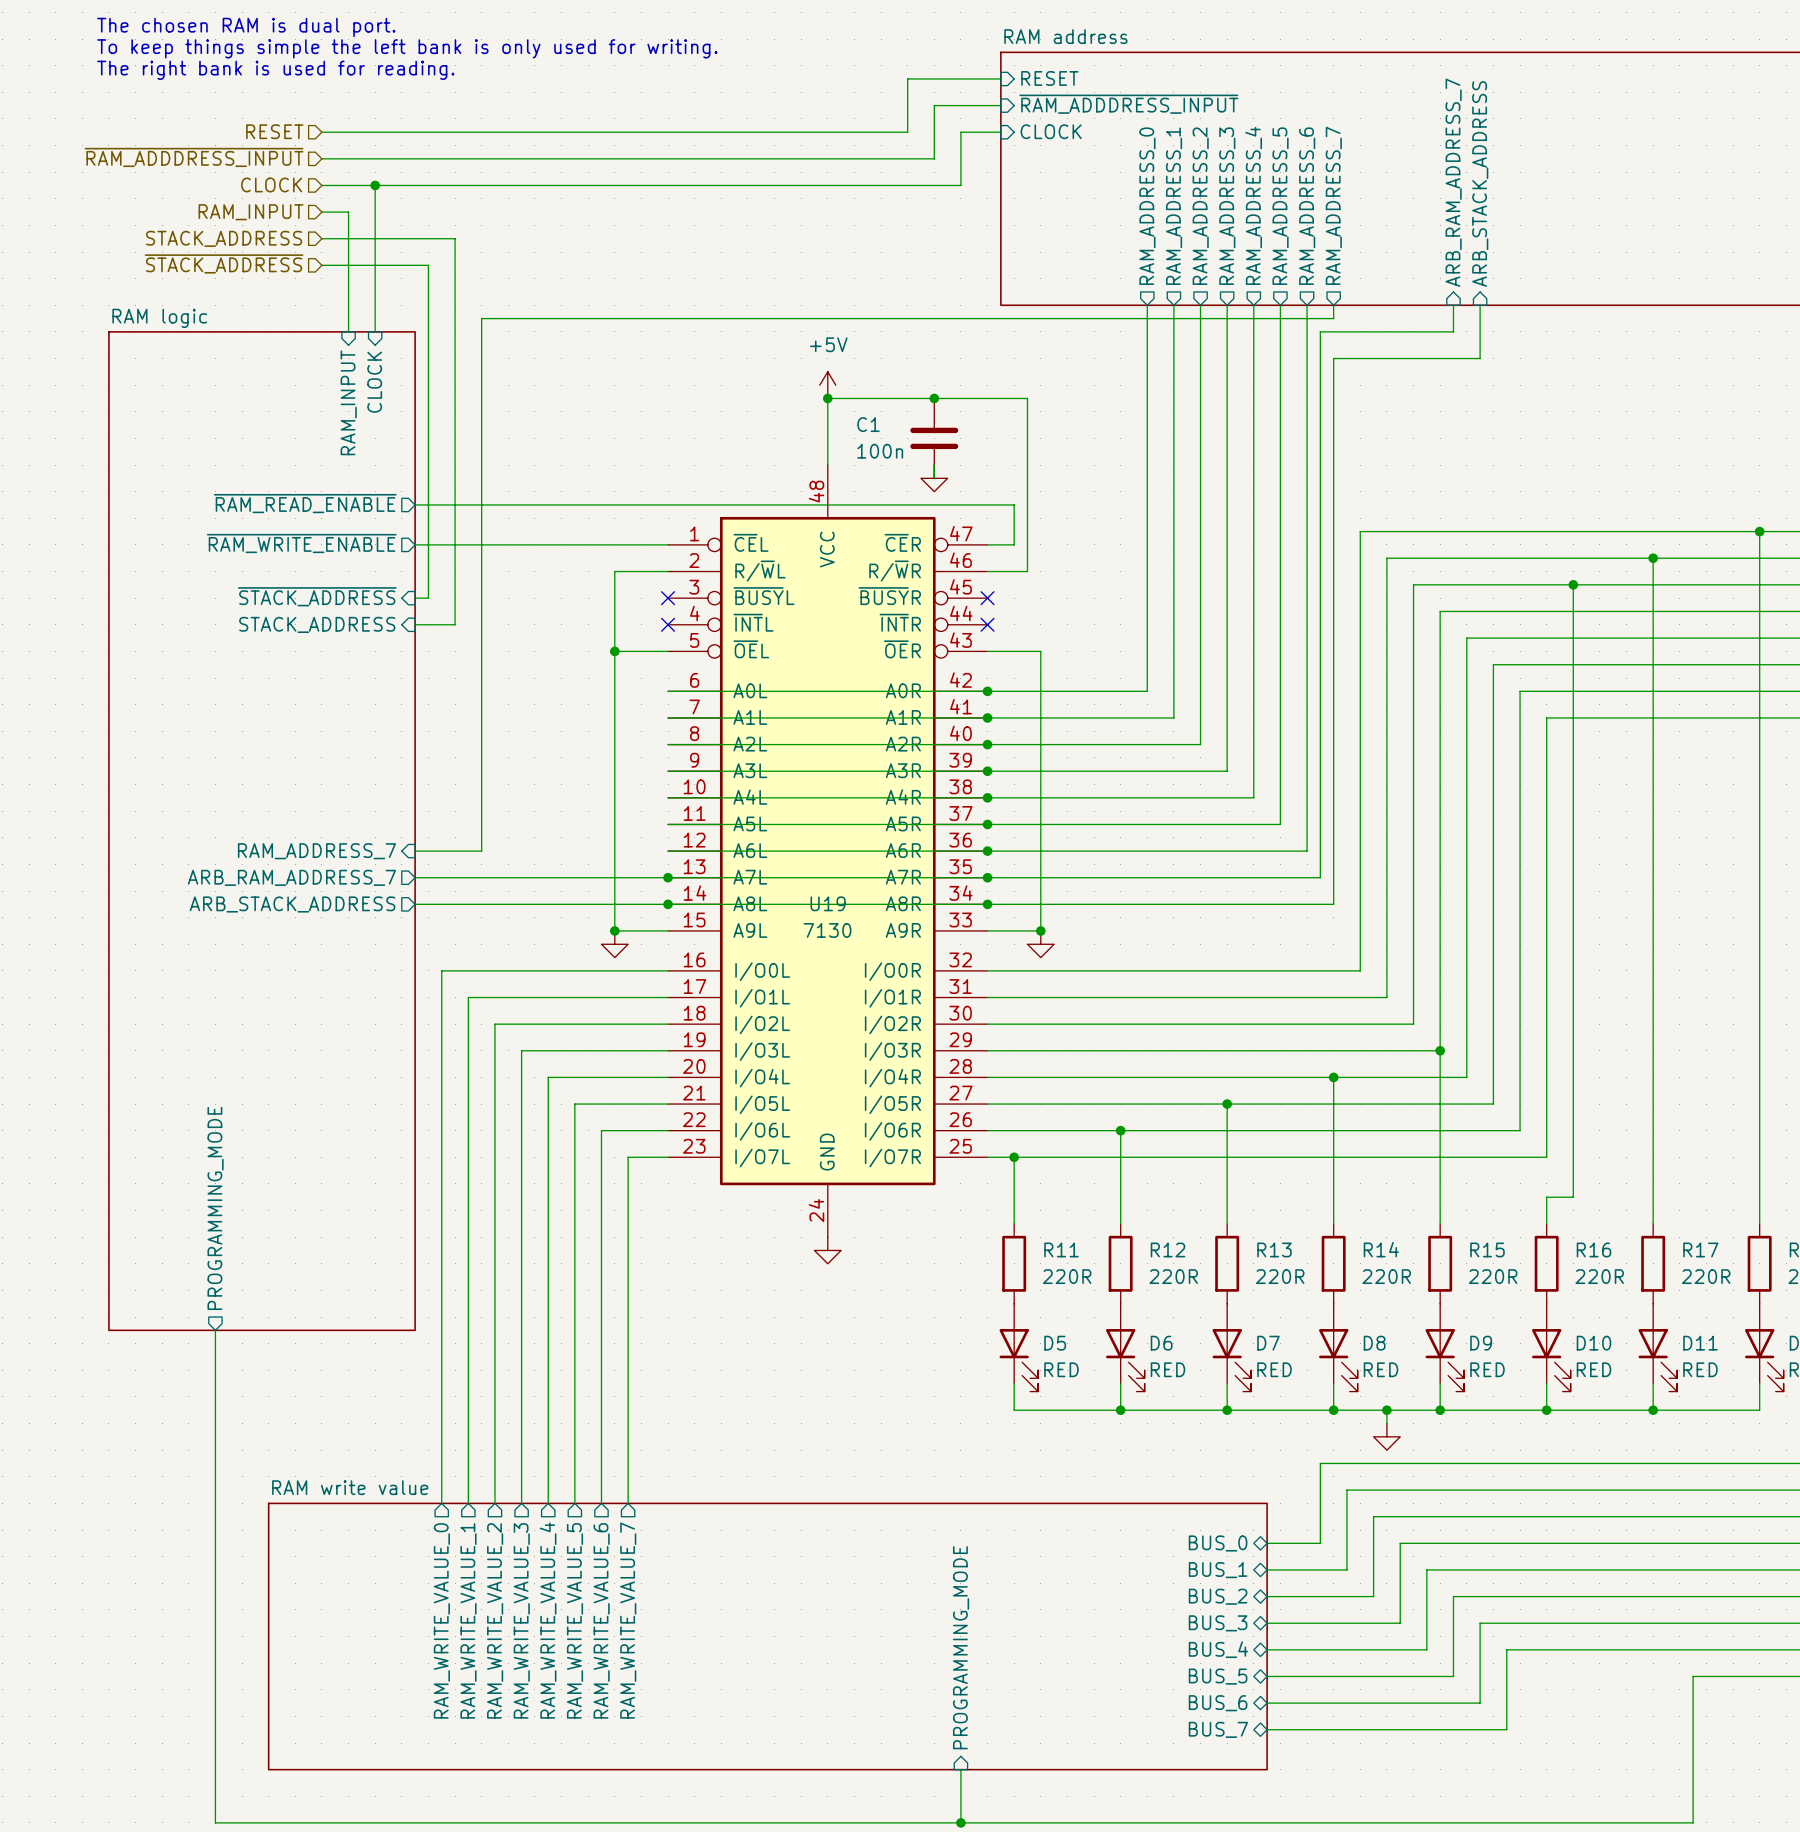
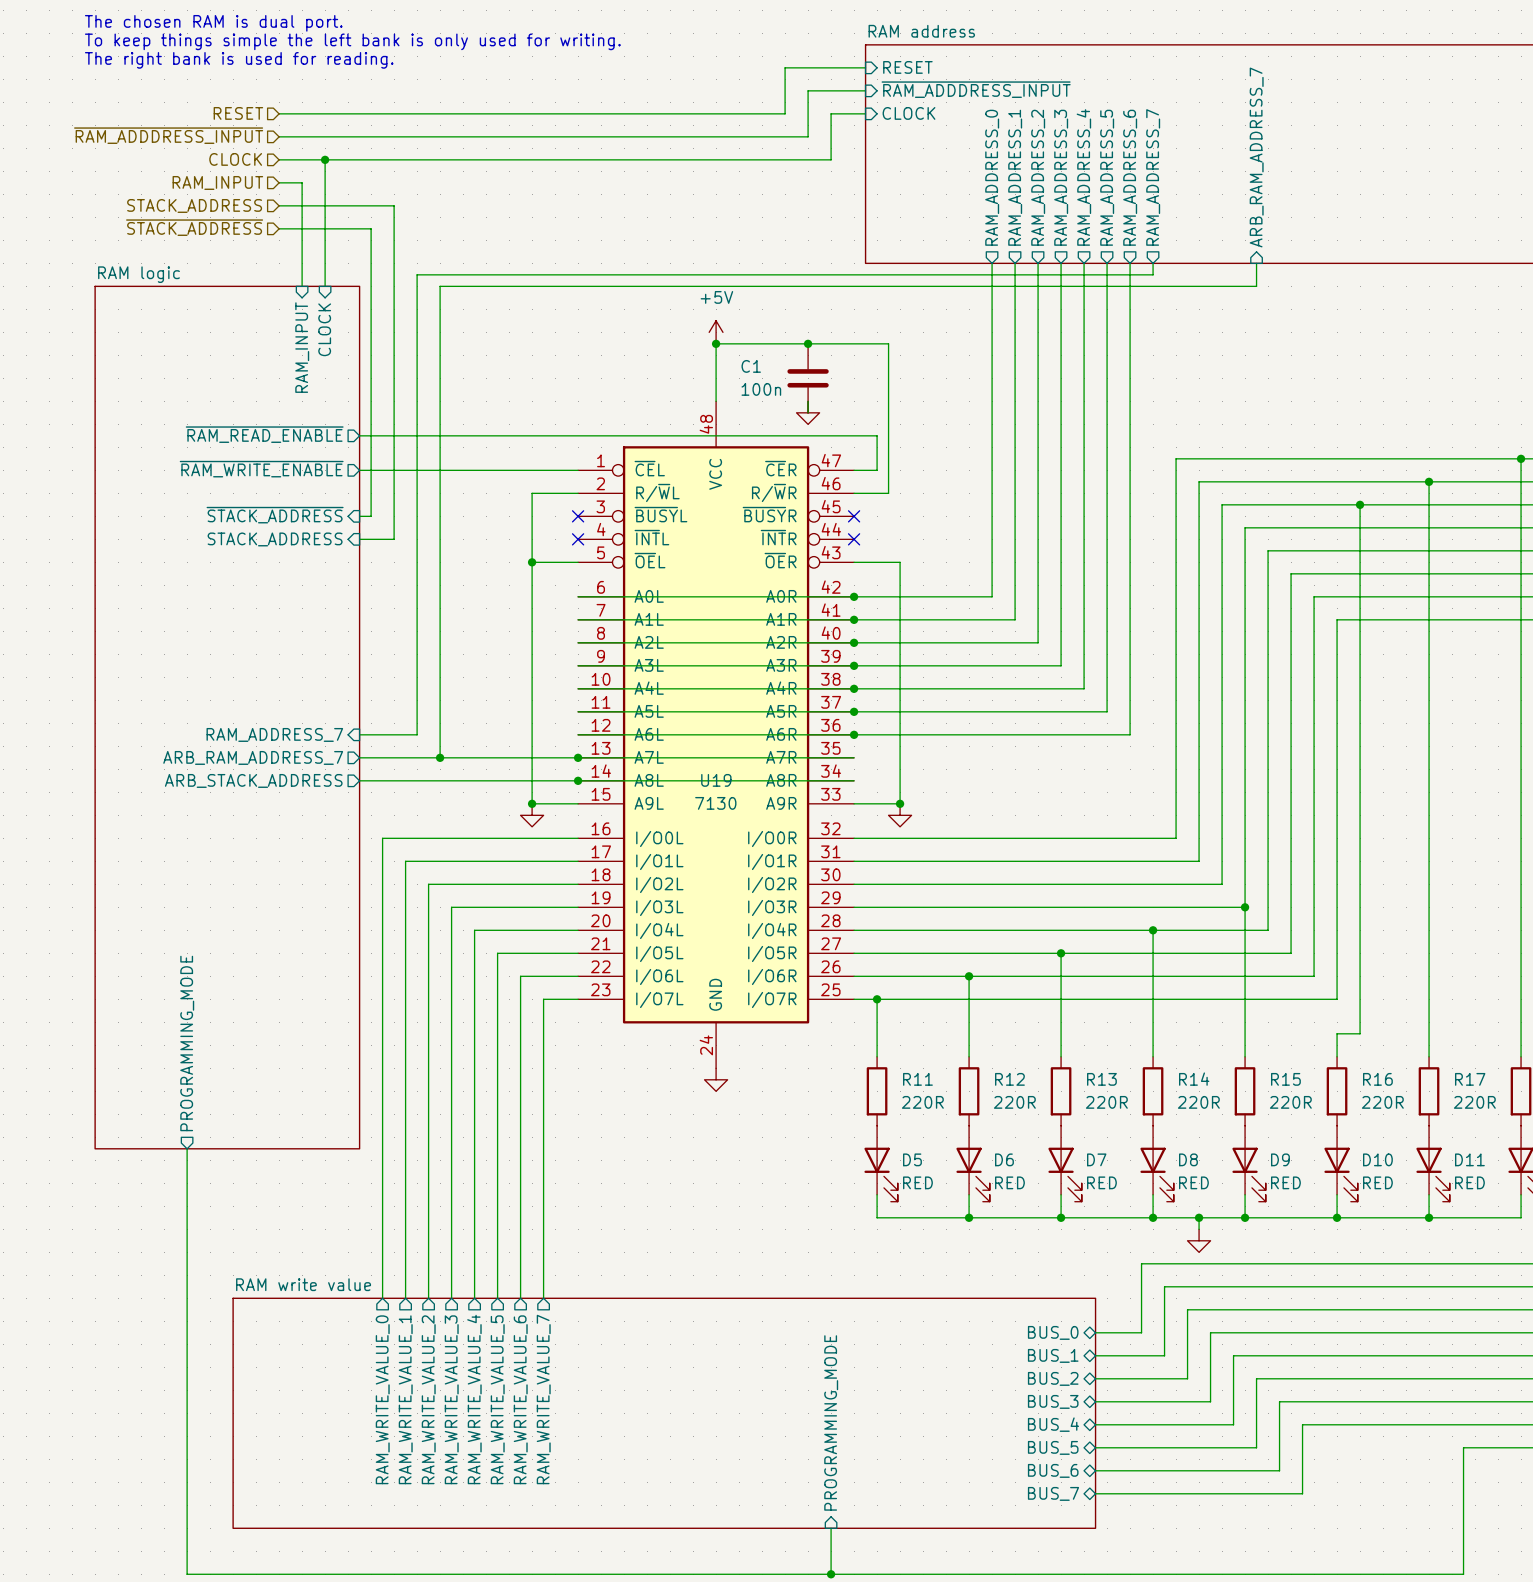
sheet pin: ARB_STACK_ADDRESS (1480, 183) -> none
wire: (1480, 305) (1480, 358) (1333, 358) (1333, 904) (987, 904) -> none
wire: (1320, 331) (1320, 877) (987, 877) -> (1141, 286) (440, 286) (440, 757)
junction: none -> (440, 757)
junction: (987, 877) -> none
junction: (987, 904) -> none

